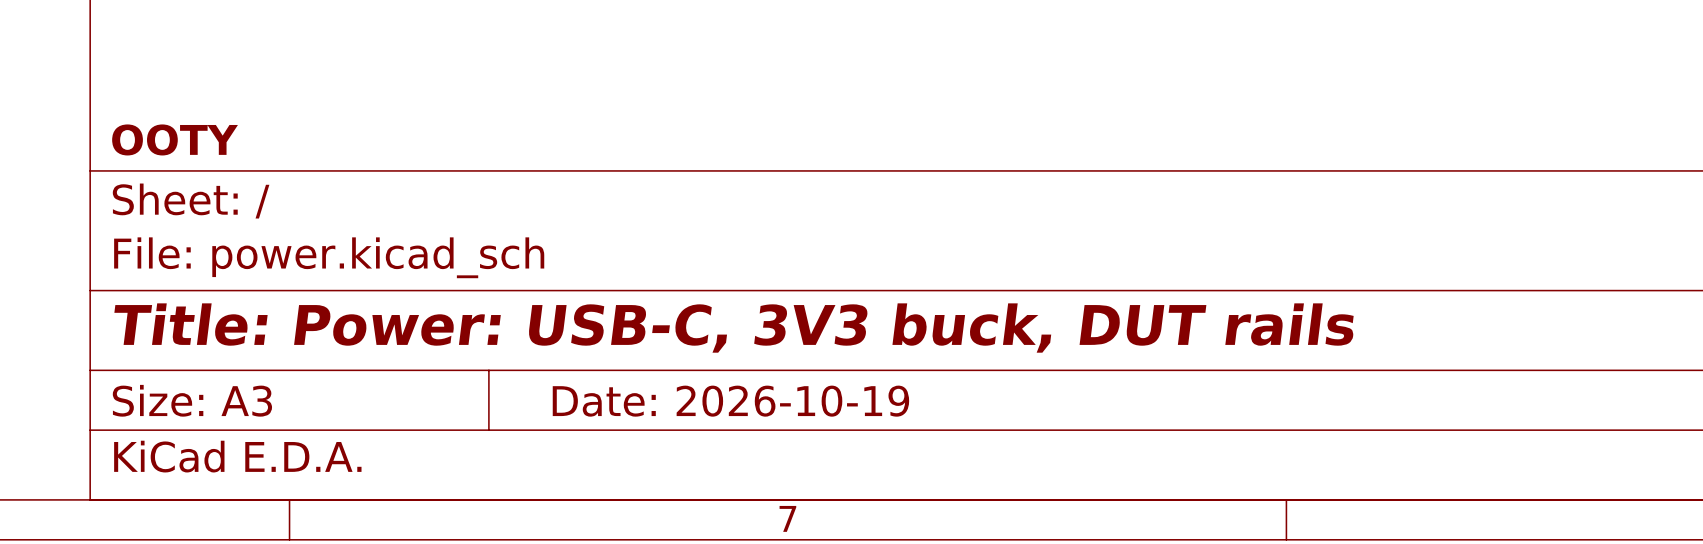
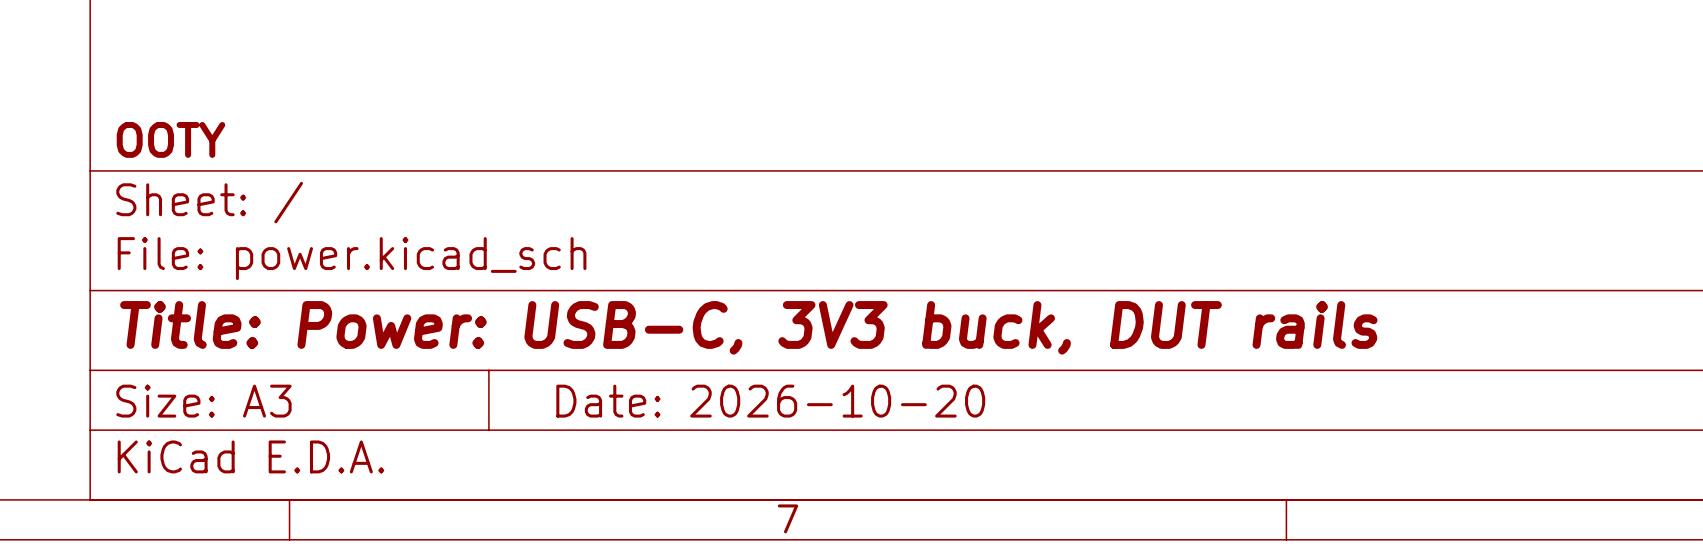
title block: Date: 2026-10-19 (730, 401) -> Date: 2026-10-20 (770, 401)

